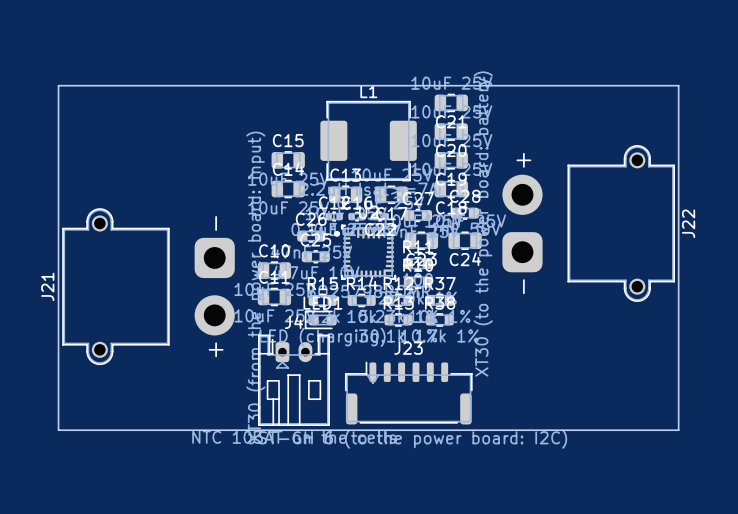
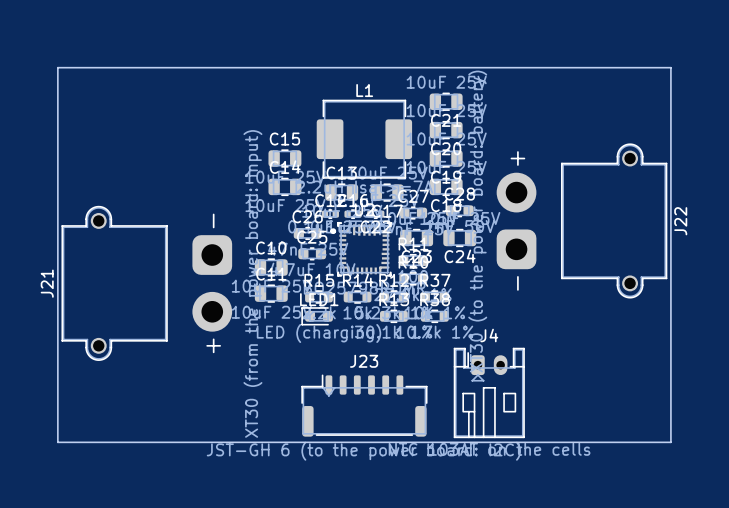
board edge: (58, 85) (678, 85) -> (57, 84) (57, 67) (670, 67) (670, 84)
J4 position: (293, 380) -> (489, 392)
J23 position: (408, 393) -> (364, 405)
board edge: (58, 430) (678, 430) -> (57, 425) (57, 442) (670, 442) (670, 425)

